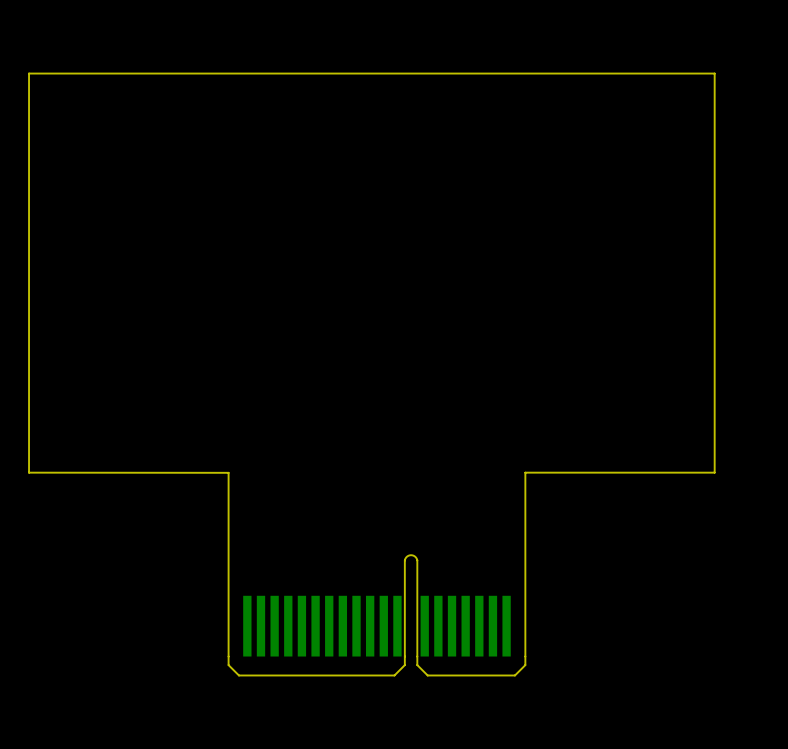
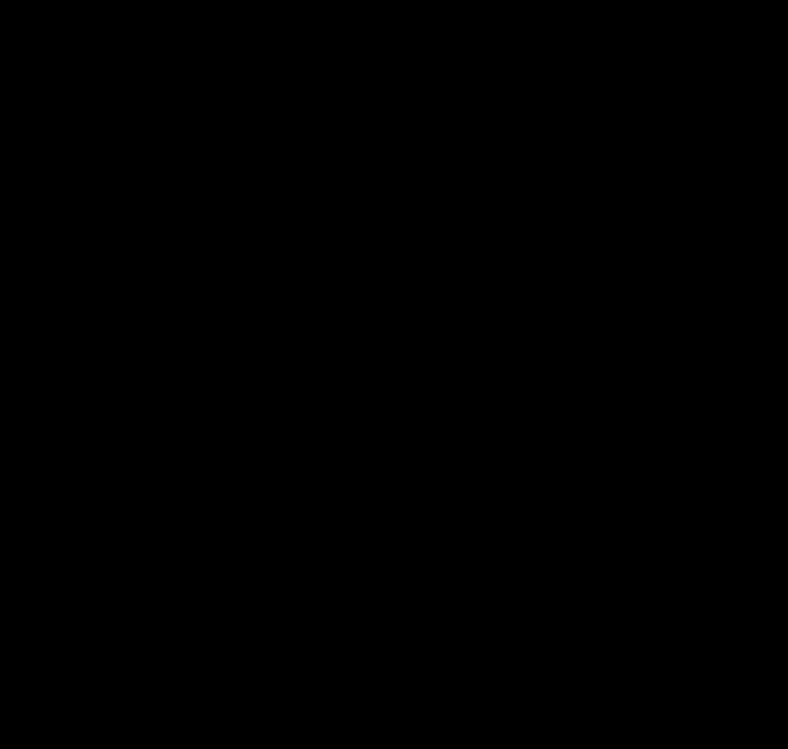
board edge: (525, 472) (714, 472) (714, 73) (29, 73) (29, 472) (228, 472) -> none
part: (376, 574) -> none

